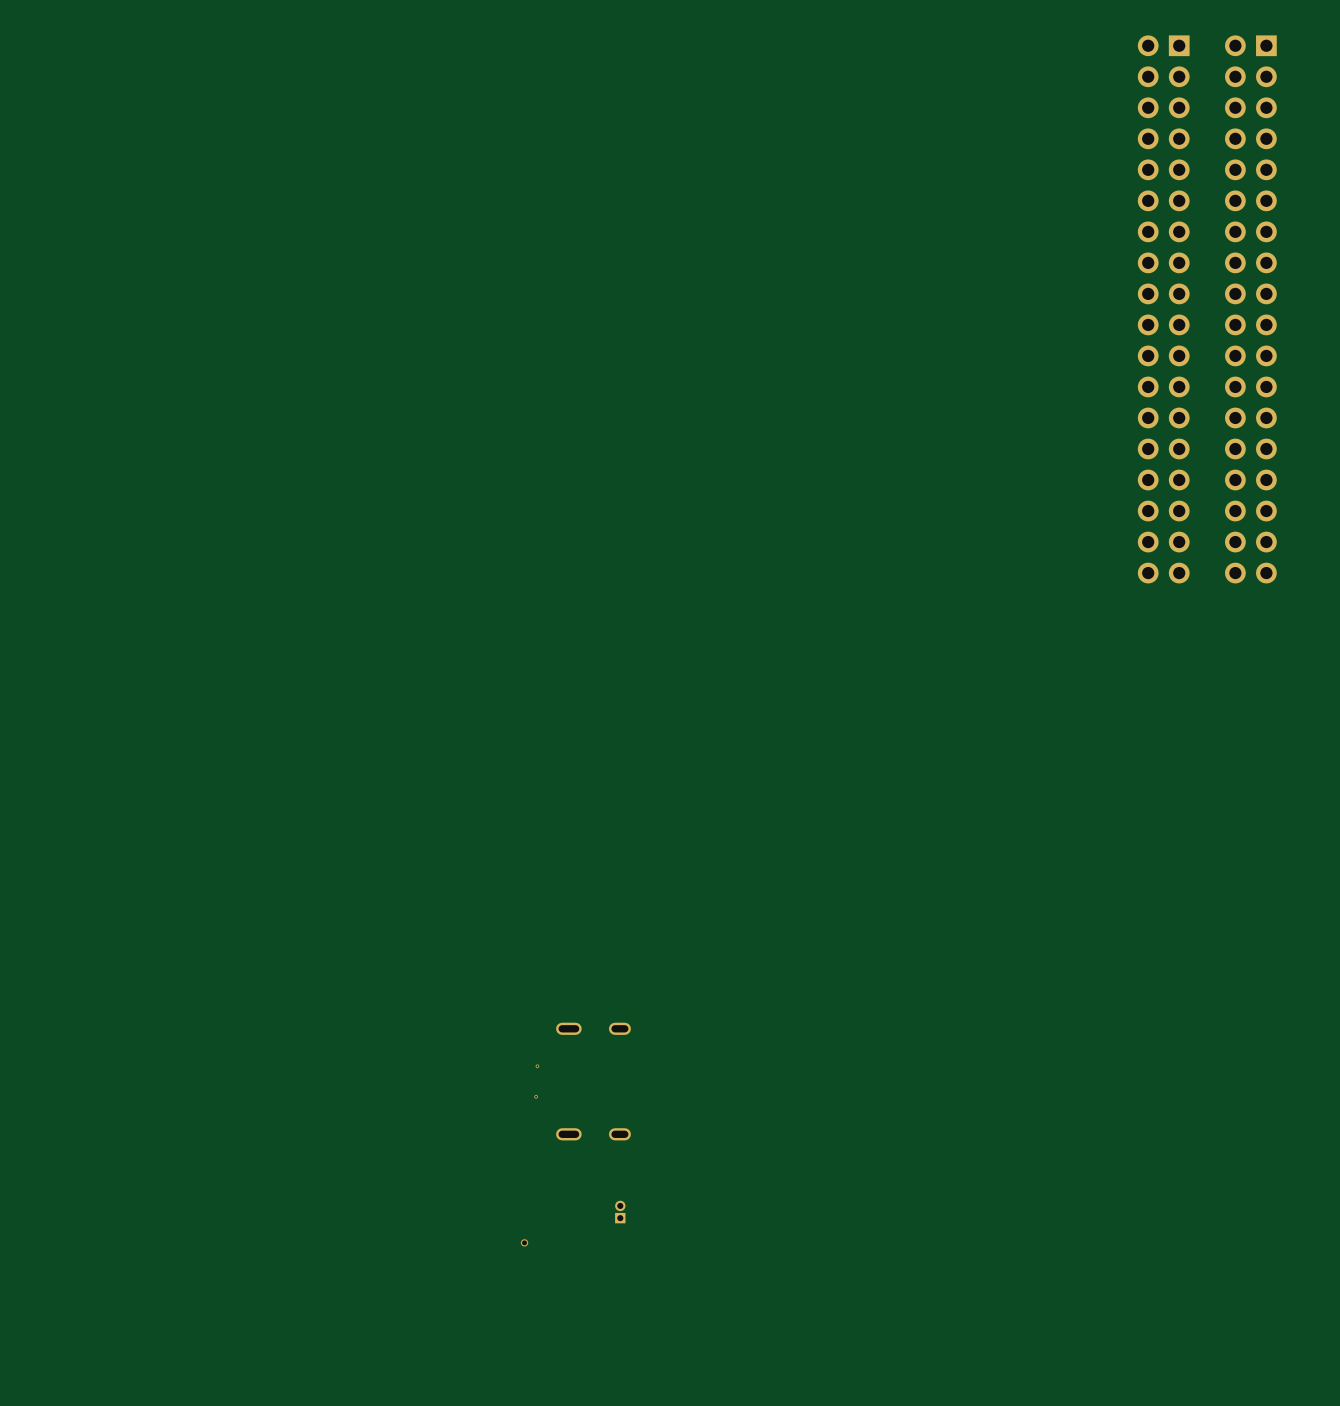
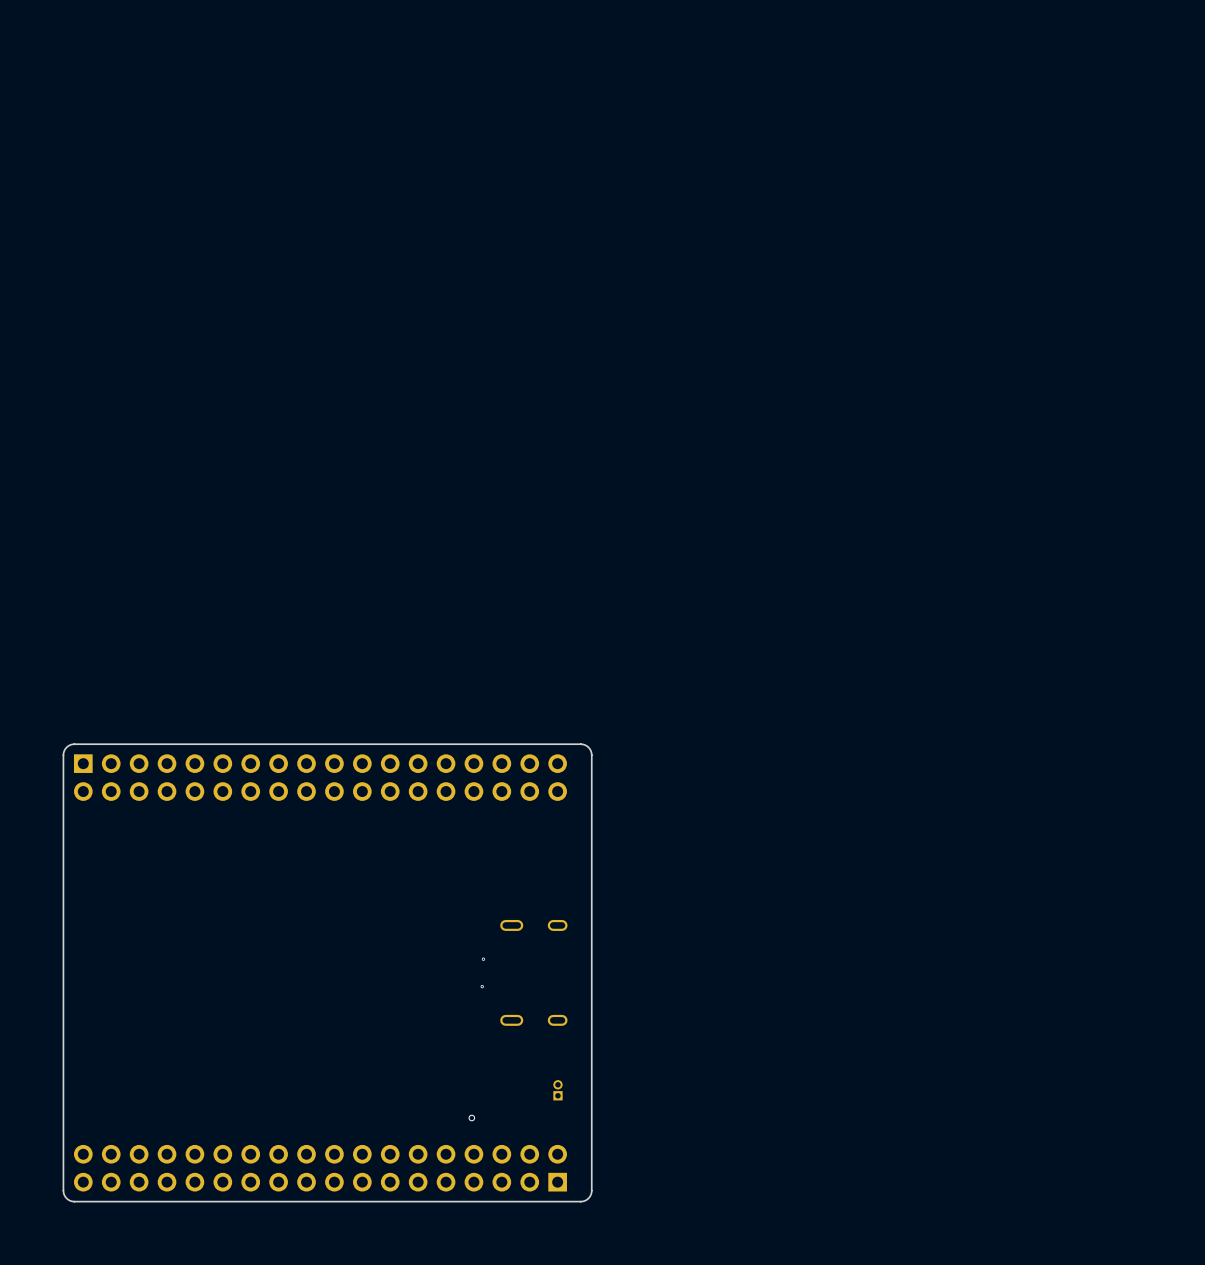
part: (1163, 309) -> none
part: (1250, 309) -> none
board edge: none -> (580, 744) (74, 744) (67, 746) (63, 755) (63, 1190) (65, 1197) (74, 1201) (580, 1201) (587, 1199) (591, 1190) (591, 755) (588, 747) (580, 744)
part: none -> (320, 777)
part: none -> (320, 1168)

